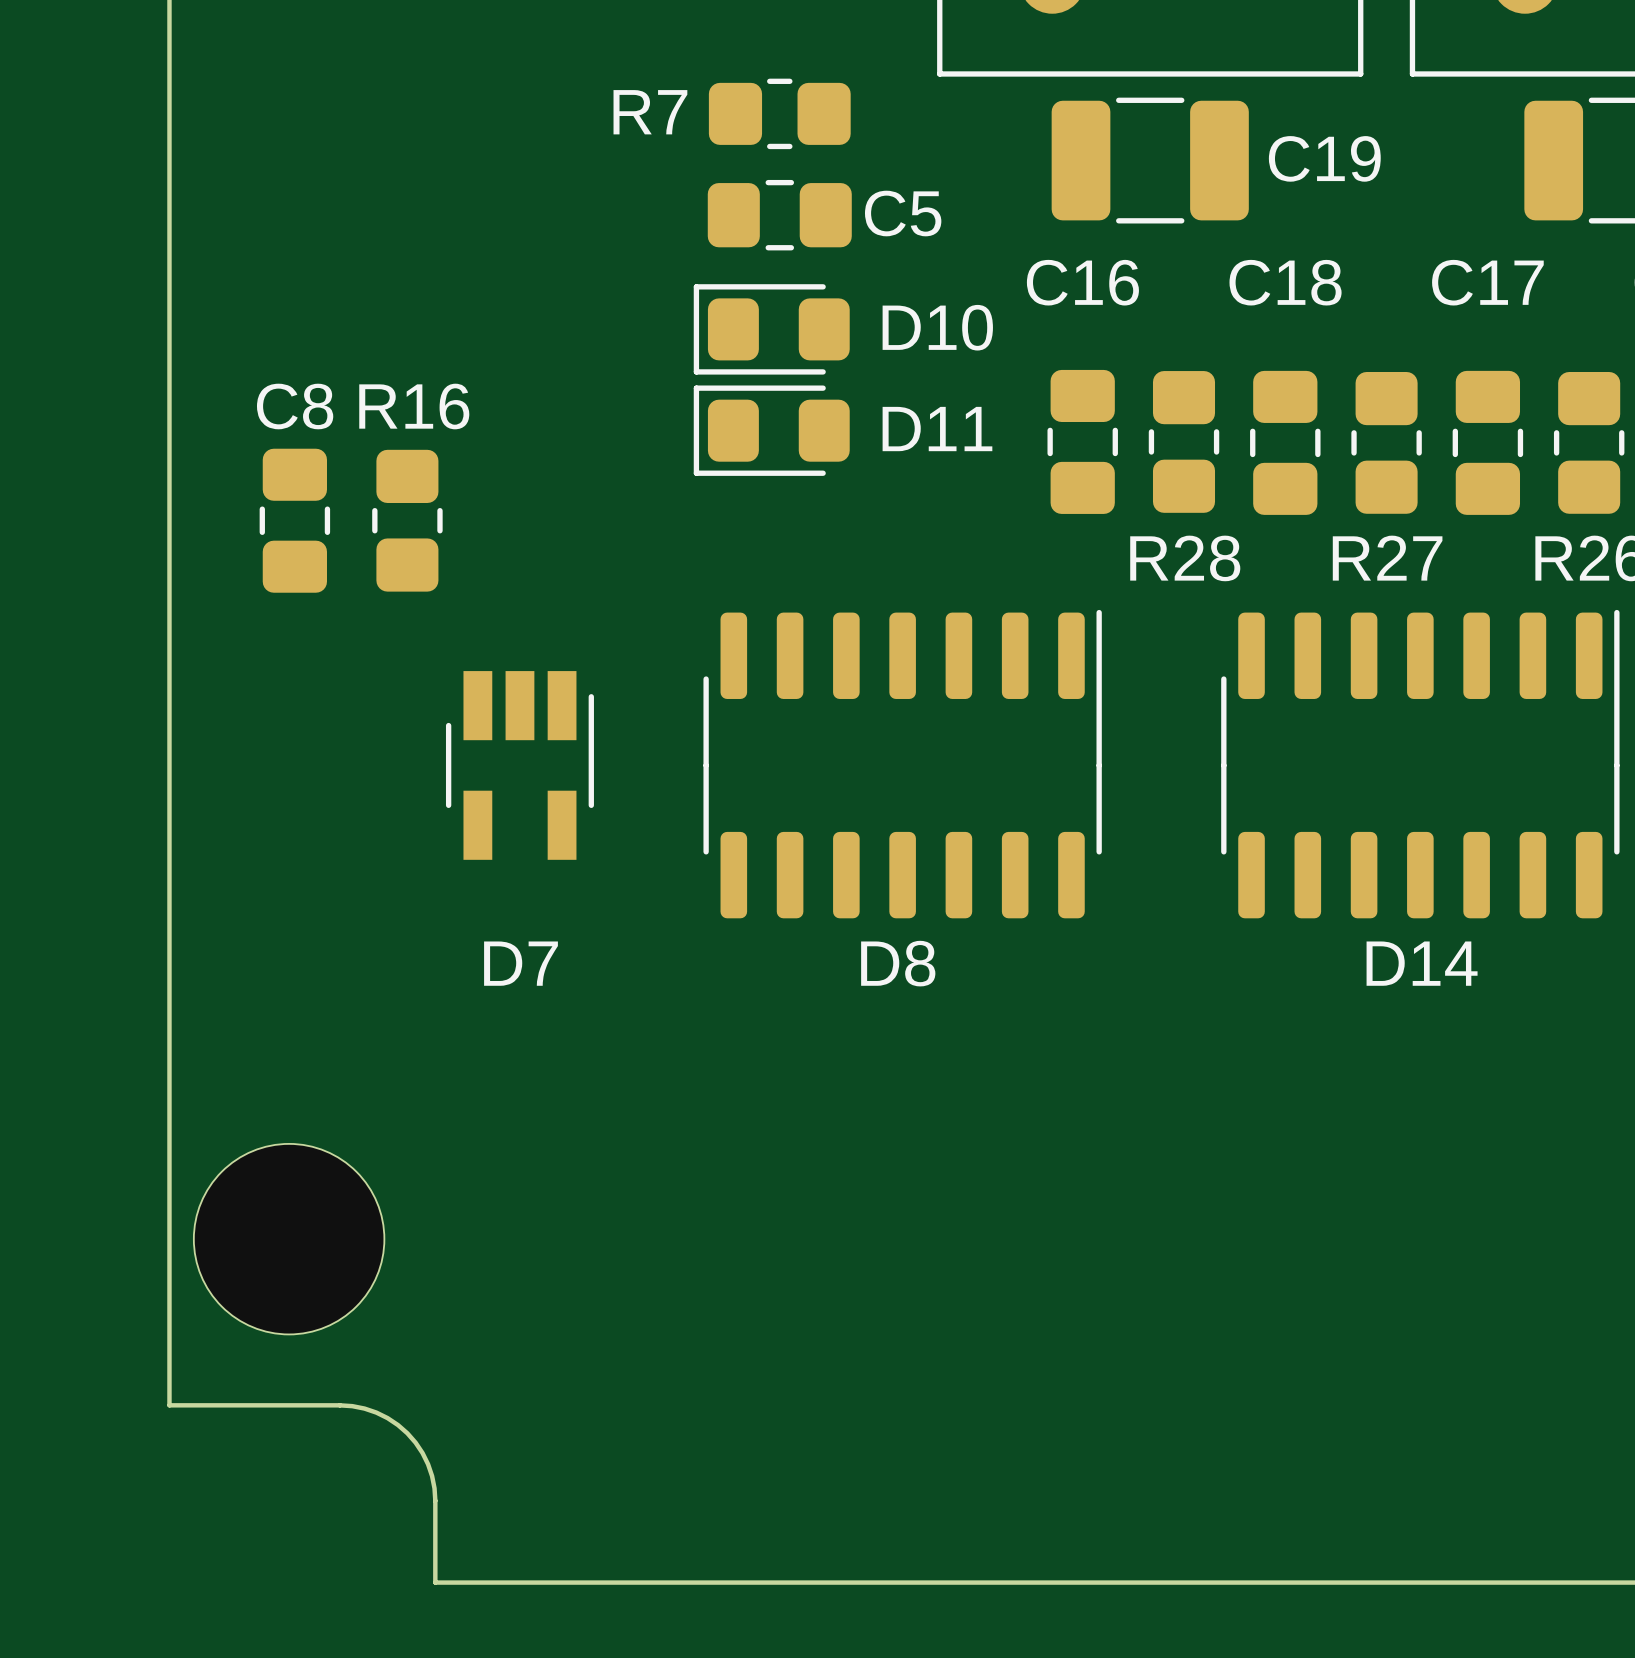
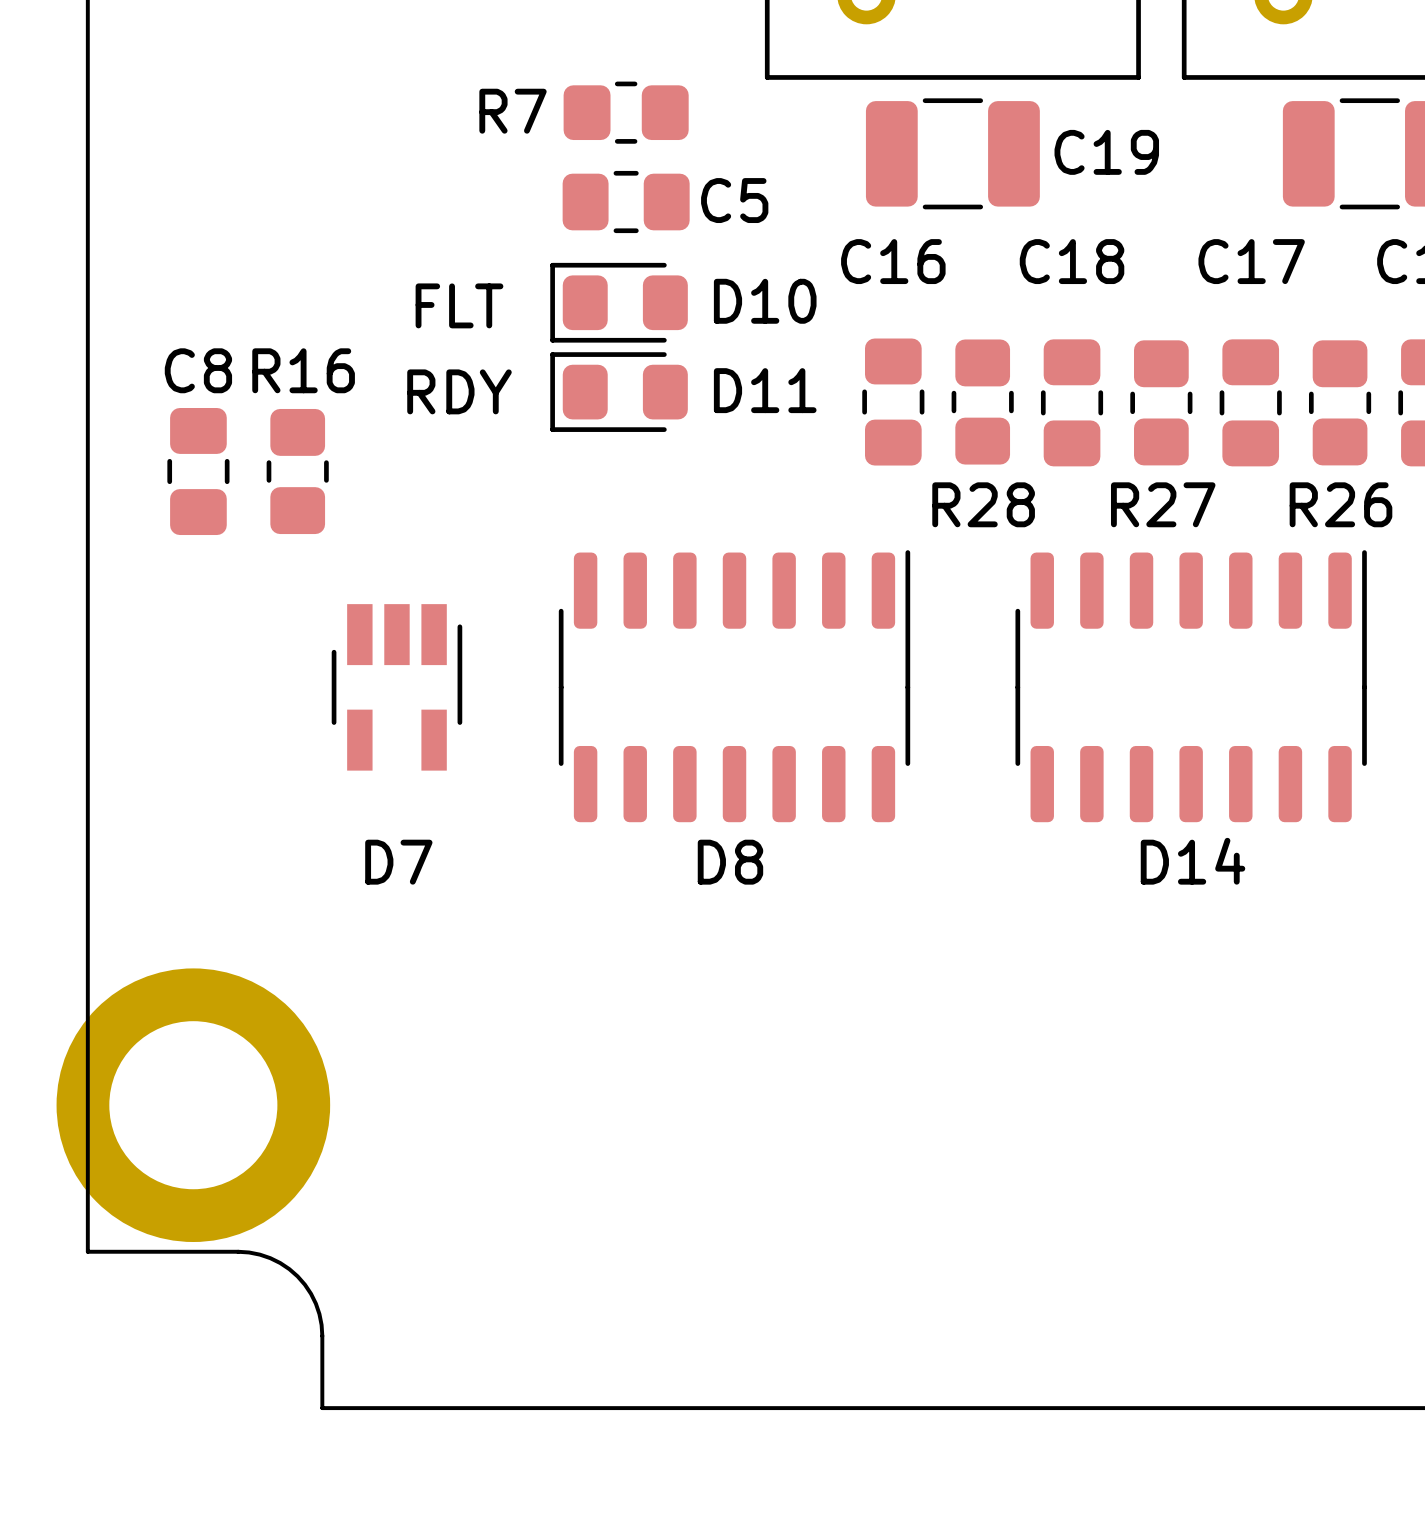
text: none -> FLT (459, 305)
text: none -> RDY (459, 391)
part footprint: [193, 1143, 385, 1335] -> [56, 968, 331, 1242]

